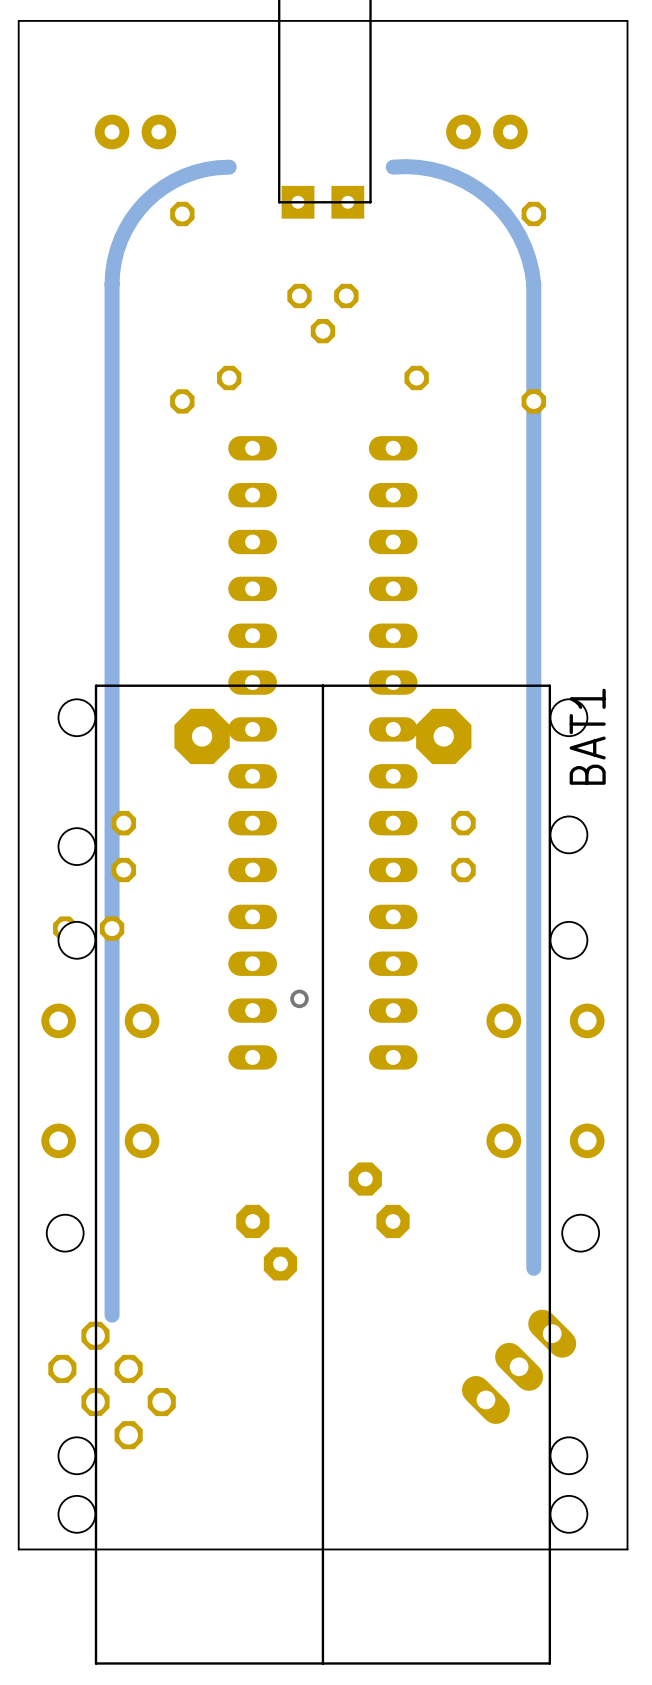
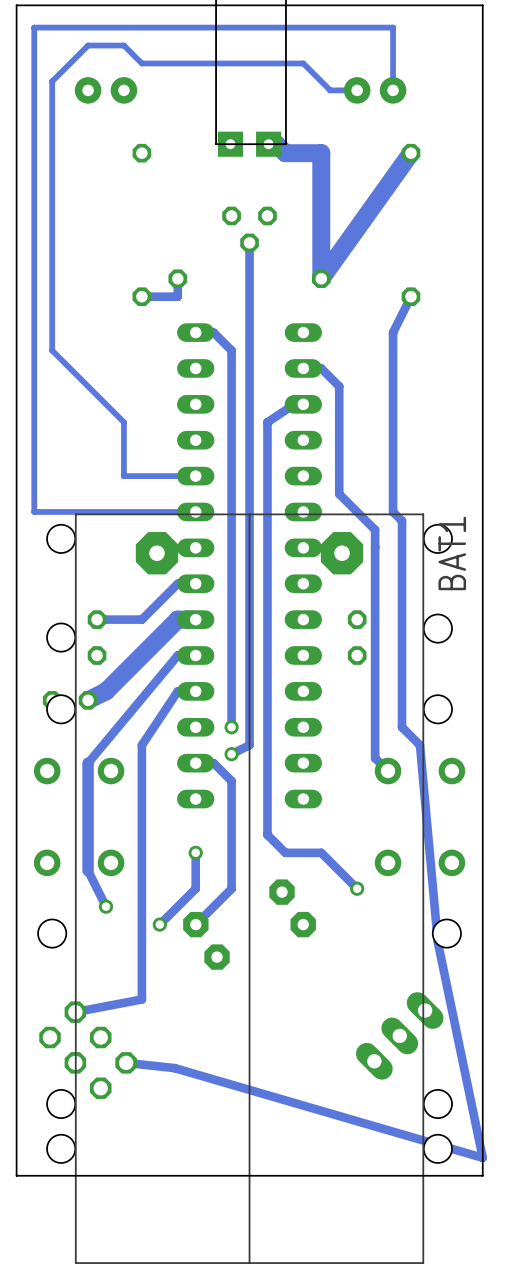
track: none -> (357, 90) (330, 90) (303, 63) (141, 63) (123, 45) (88, 45) (52, 81) (52, 350) (123, 422) (123, 476) (195, 476)
track: none -> (393, 90) (393, 27) (34, 27) (34, 511) (195, 511)
track: (229, 167) (195, 172) (173, 180) (154, 193) (138, 209) (125, 229) (117, 250) (112, 272) (112, 1010) -> (195, 655) (177, 655) (88, 763)
track: (393, 167) (418, 167) (443, 172) (466, 182) (487, 196) (505, 214) (519, 235) (529, 259) (533, 284) (533, 1268) -> none
track: none -> (268, 144) (276, 144) (285, 153) (321, 153) (321, 278) (410, 153)
track: none -> (249, 242) (249, 745) (231, 754)
track: none -> (177, 278) (177, 296) (141, 296)
track: none -> (410, 296) (393, 332) (393, 511) (402, 520) (402, 727) (419, 745) (437, 942) (482, 1157) (174, 1068) (126, 1062)
track: none -> (195, 332) (213, 332) (231, 350) (231, 727)
track: none -> (303, 368) (321, 368) (339, 386) (339, 494) (375, 529) (375, 758) (388, 771)
track: none -> (303, 404) (294, 404) (267, 422) (267, 834) (285, 852) (321, 852) (357, 888)
track: none -> (195, 583) (177, 583) (141, 619) (97, 619)
track: none -> (195, 619) (177, 619) (106, 691) (88, 700)
track: none -> (195, 691) (177, 691) (141, 745) (141, 999) (75, 1012)
via: none -> (231, 727)
track: none -> (195, 763) (213, 763) (231, 781) (231, 888) (195, 924)
track: none -> (195, 852) (195, 888) (159, 924)
via: none -> (195, 852)
track: (112, 1151) (112, 1315) -> (88, 870) (106, 906)
via: none -> (357, 888)
via: none -> (106, 906)
via: none -> (159, 924)

